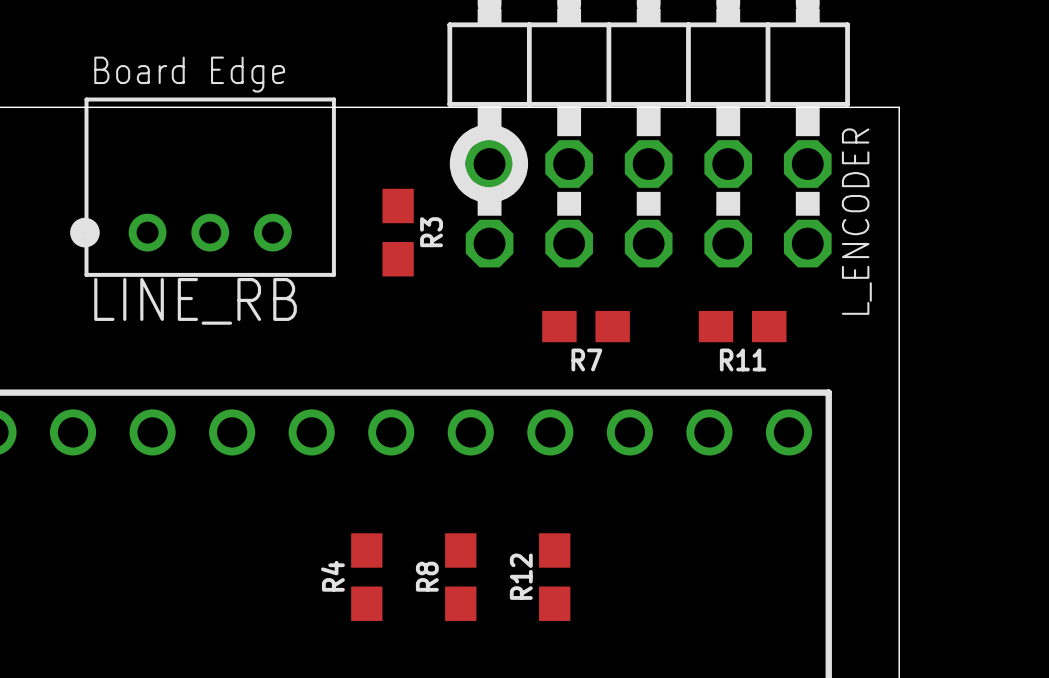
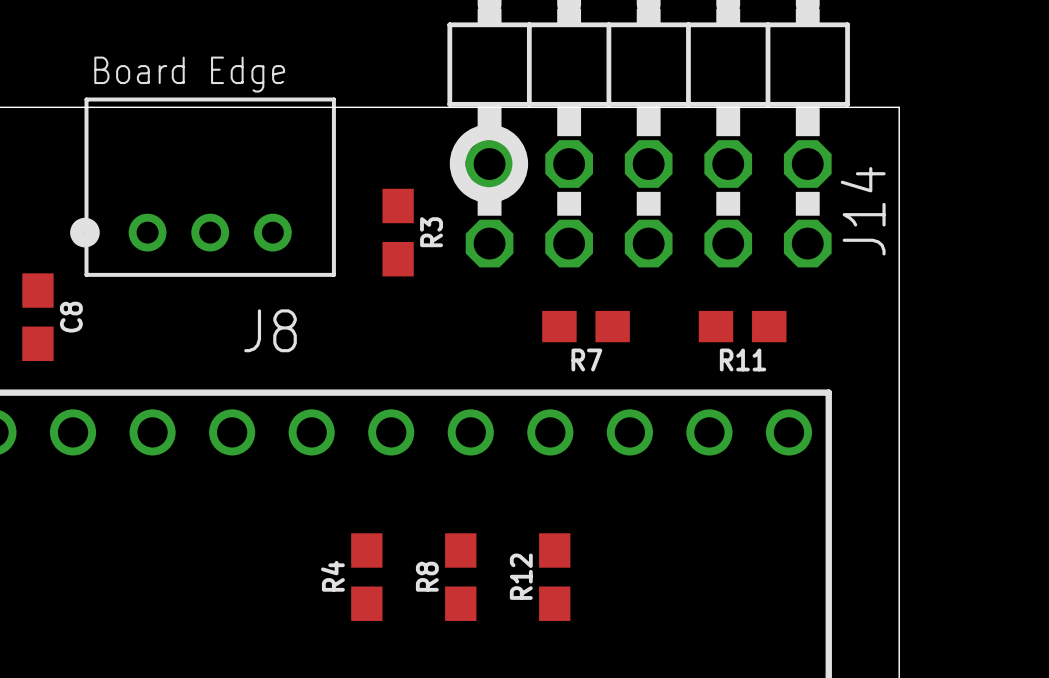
L_ENCODER name: L_ENCODER (856, 221) -> J14 (863, 211)
LINE_RB name: LINE_RB (195, 301) -> J8 (270, 330)
C8: none -> (37, 317)

